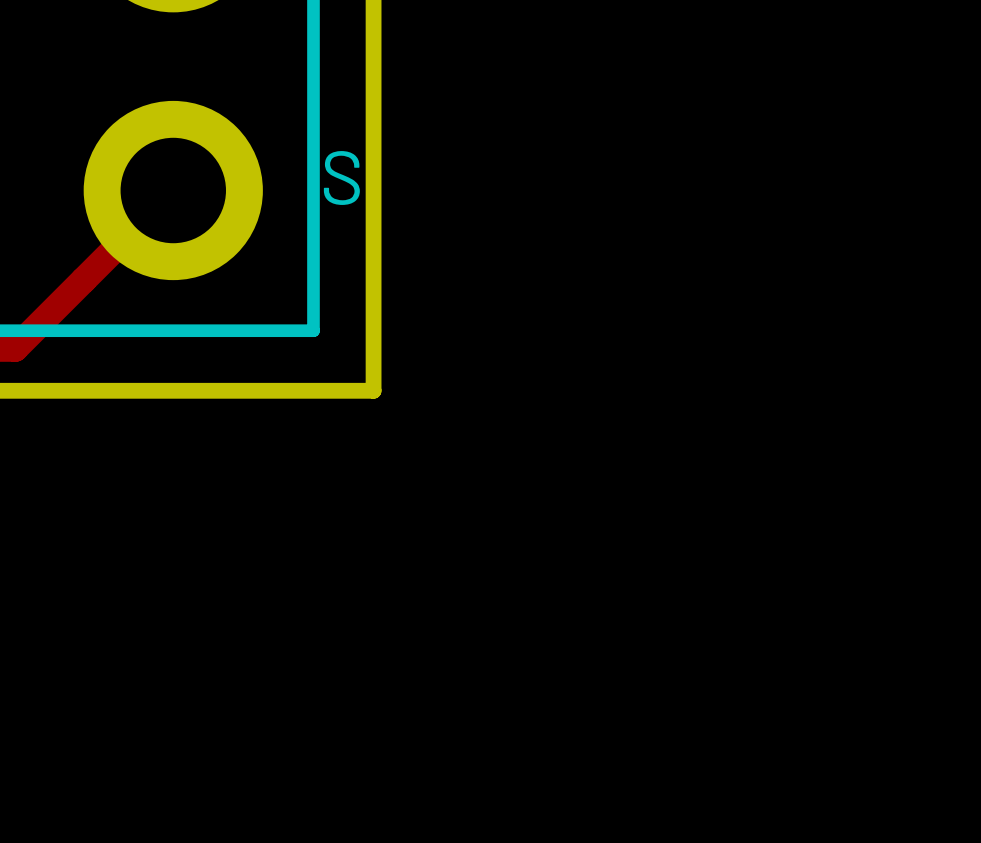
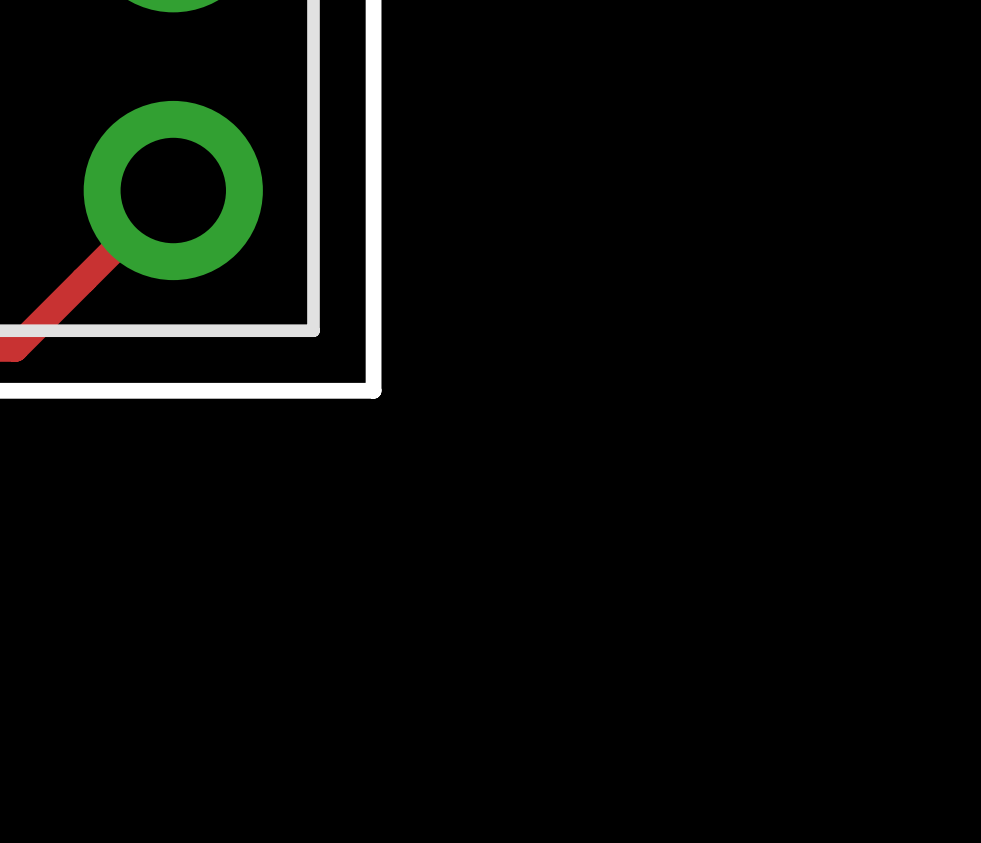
text: S (341, 177) -> none

